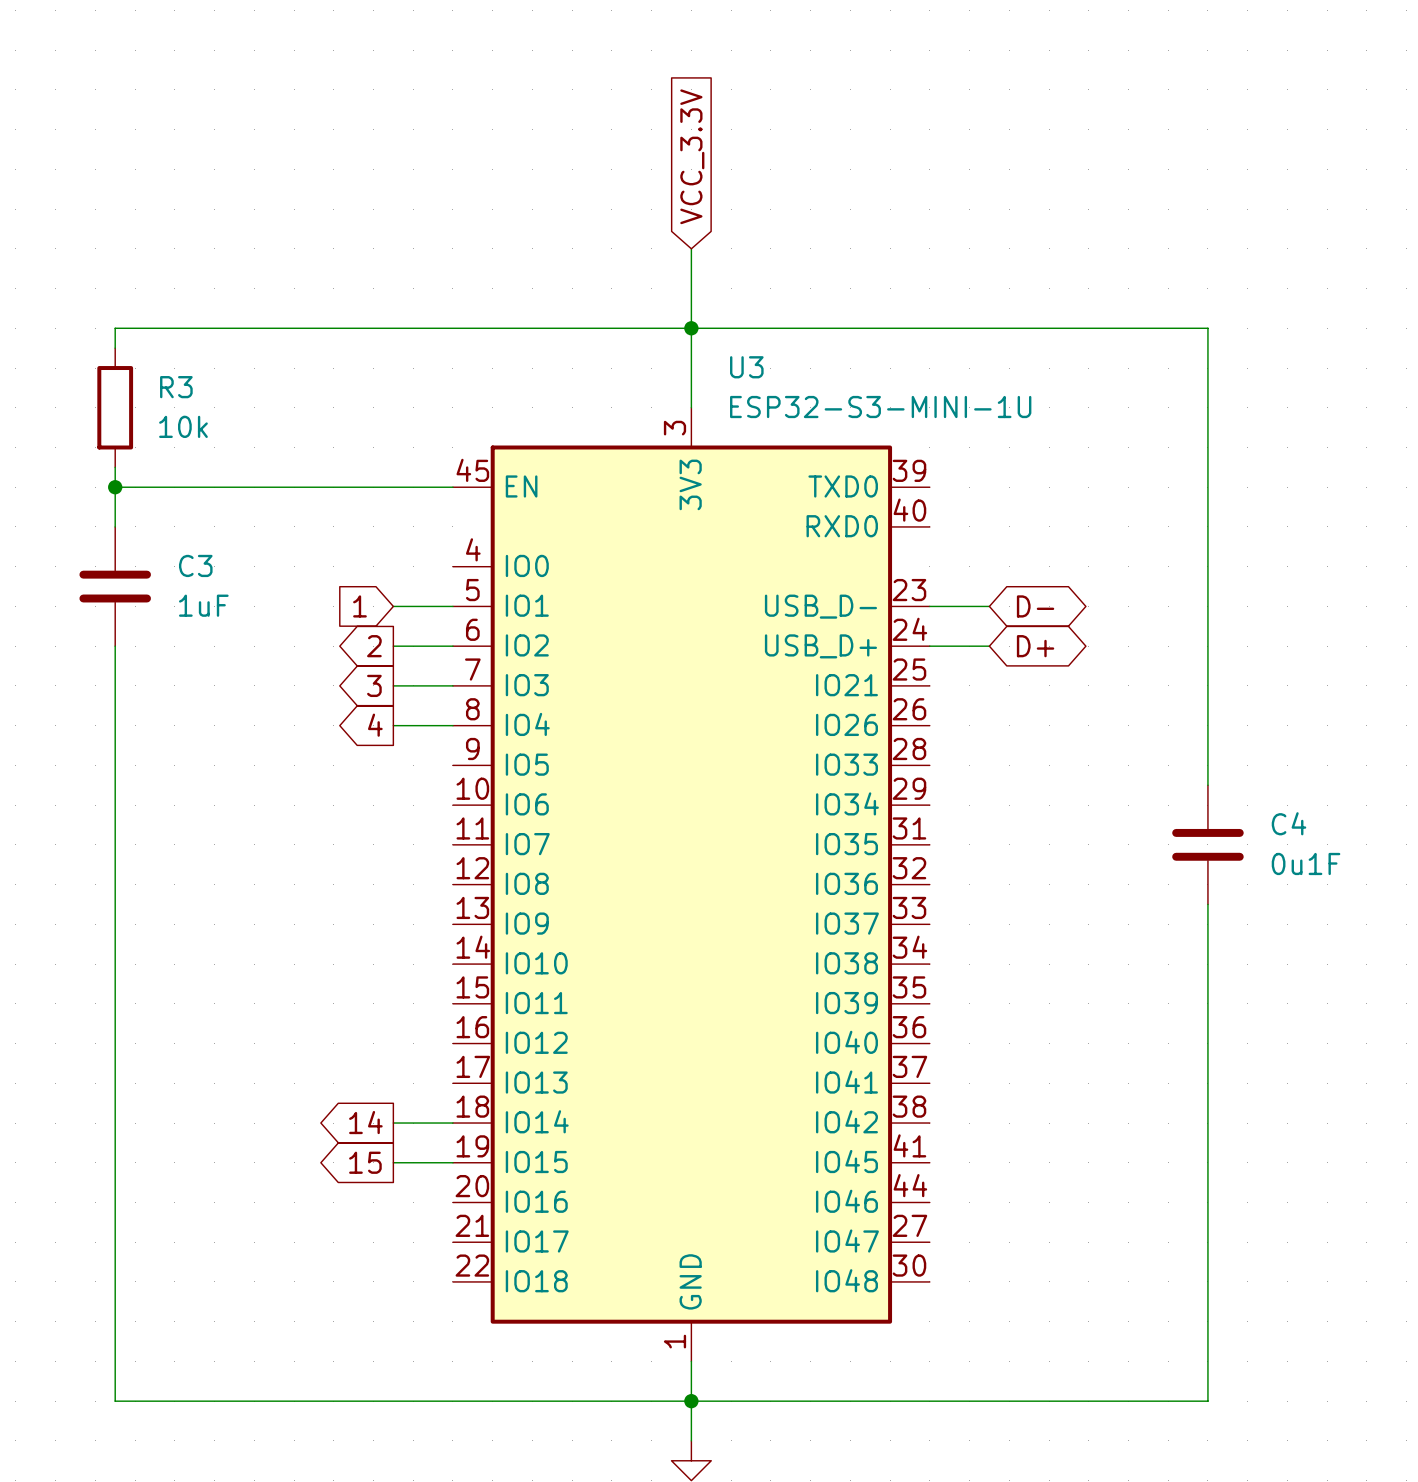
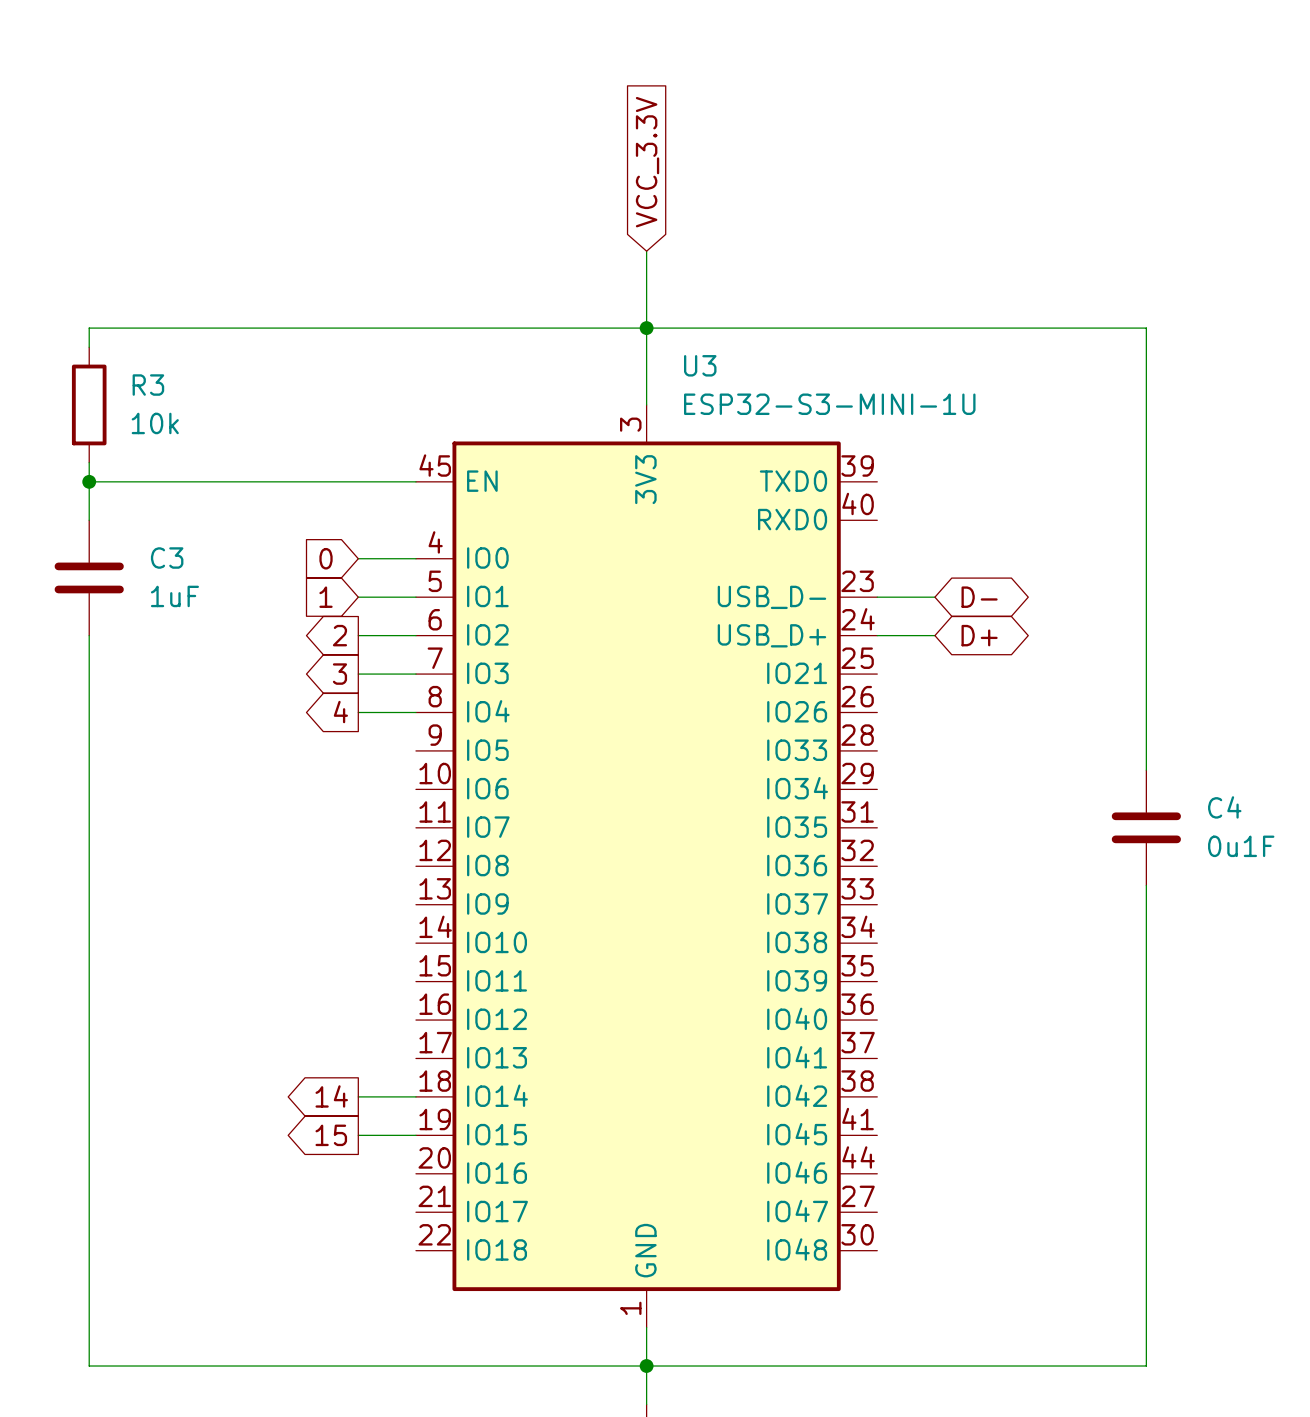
global label: none -> 0 (326, 558)
wire: none -> (358, 558) (415, 558)

